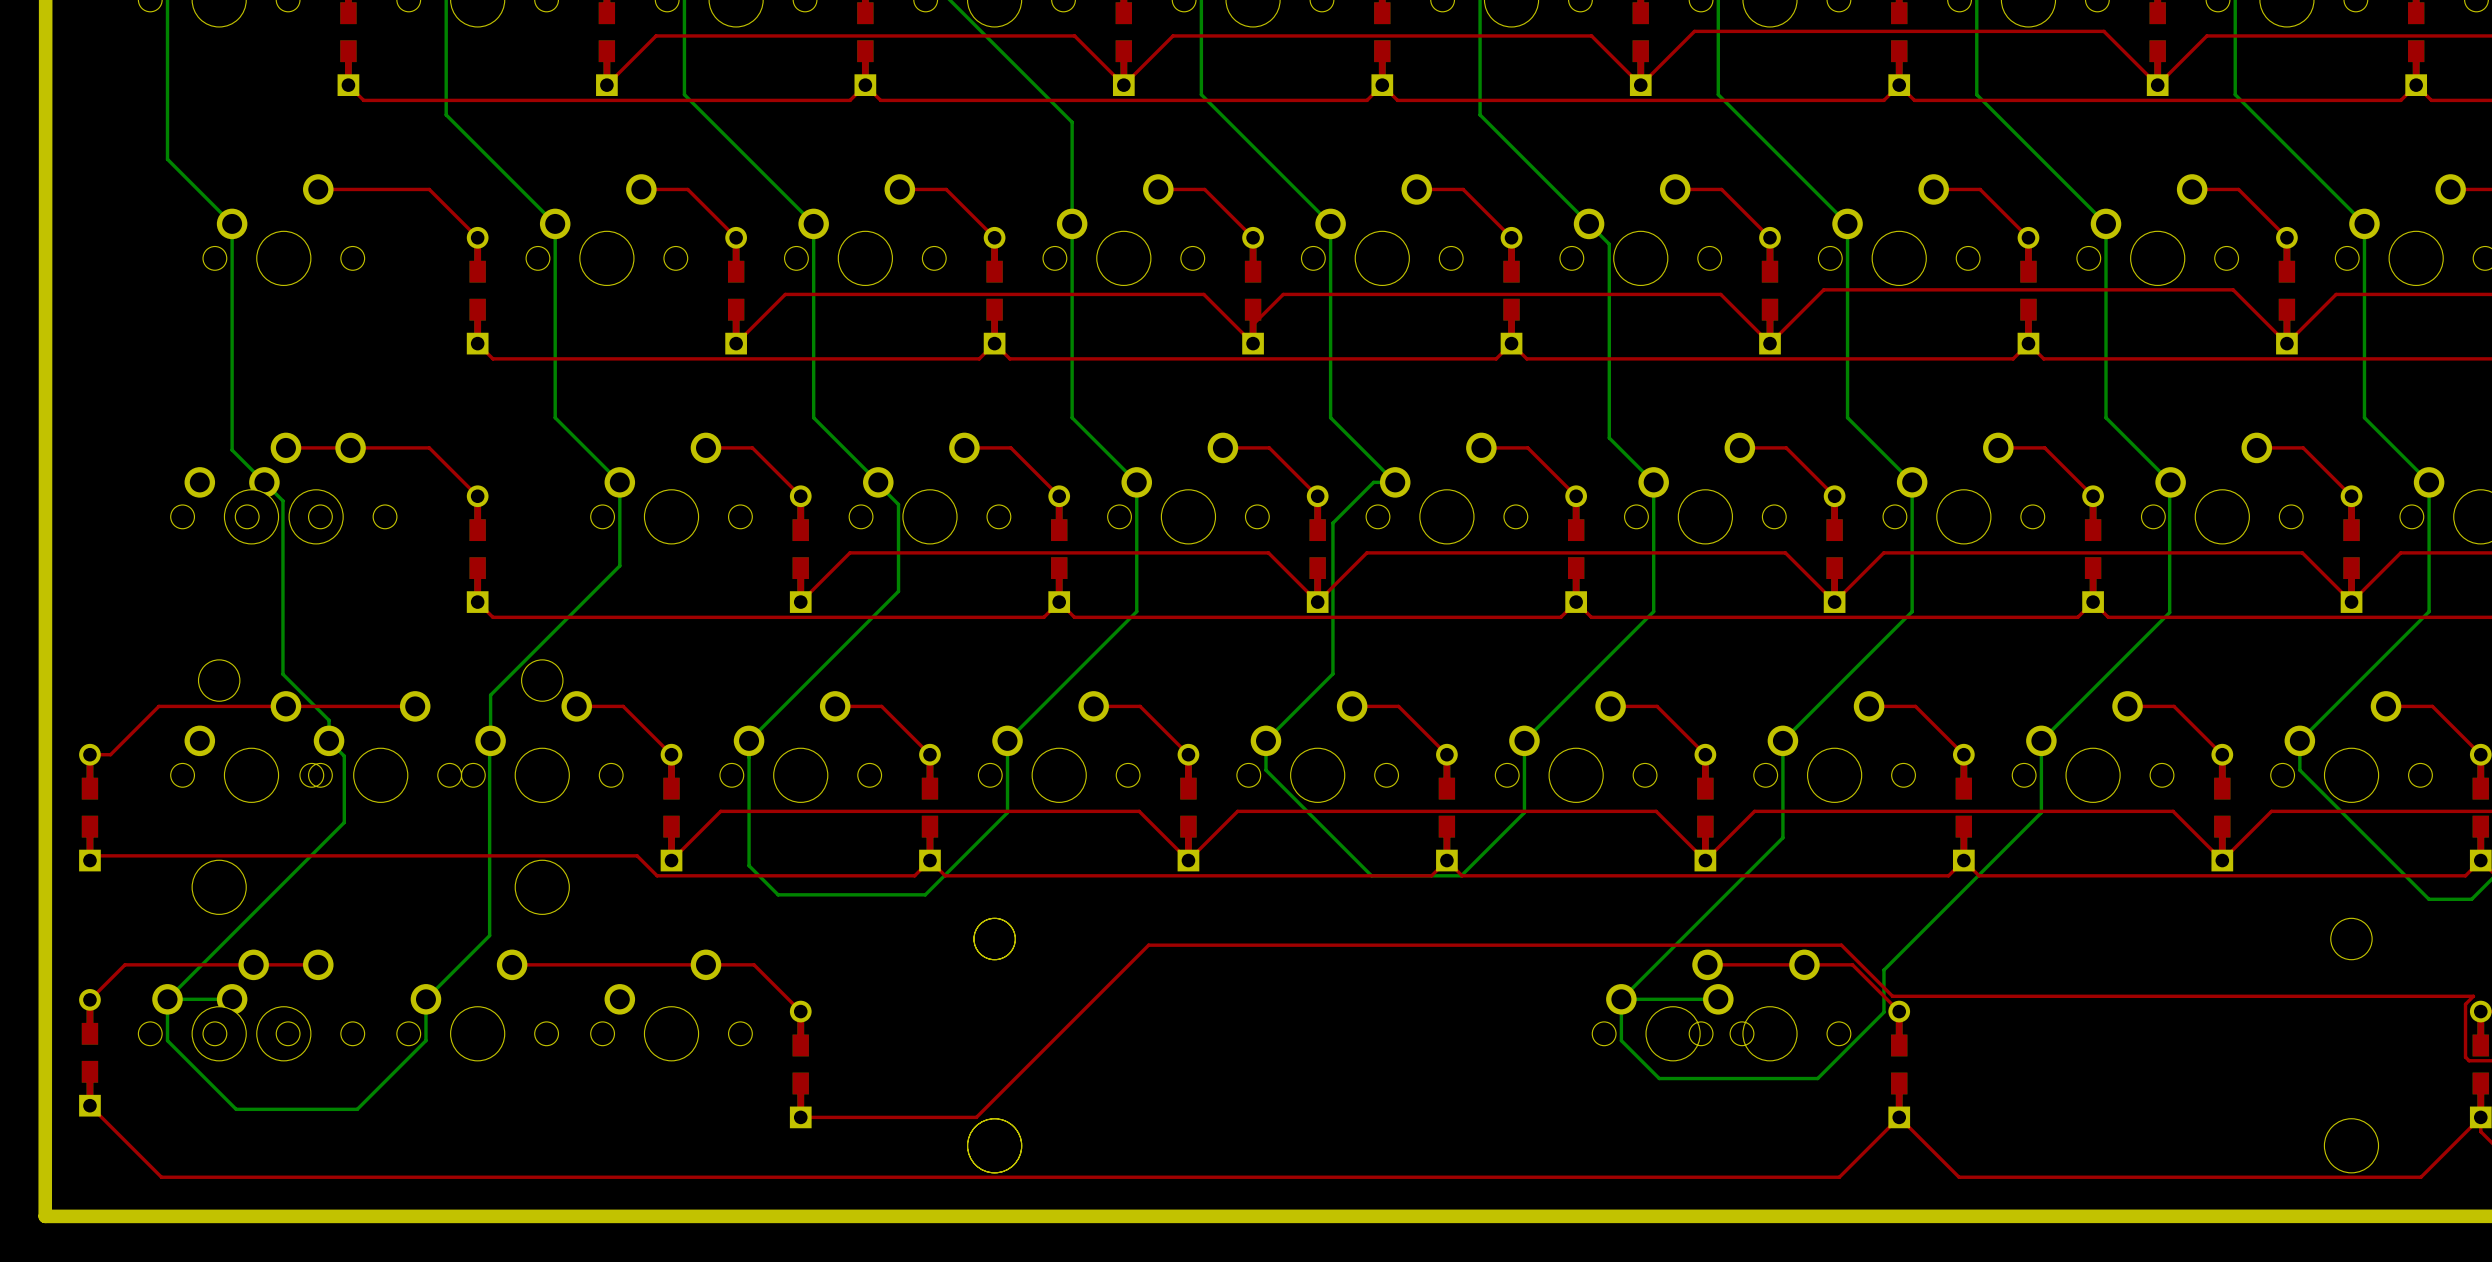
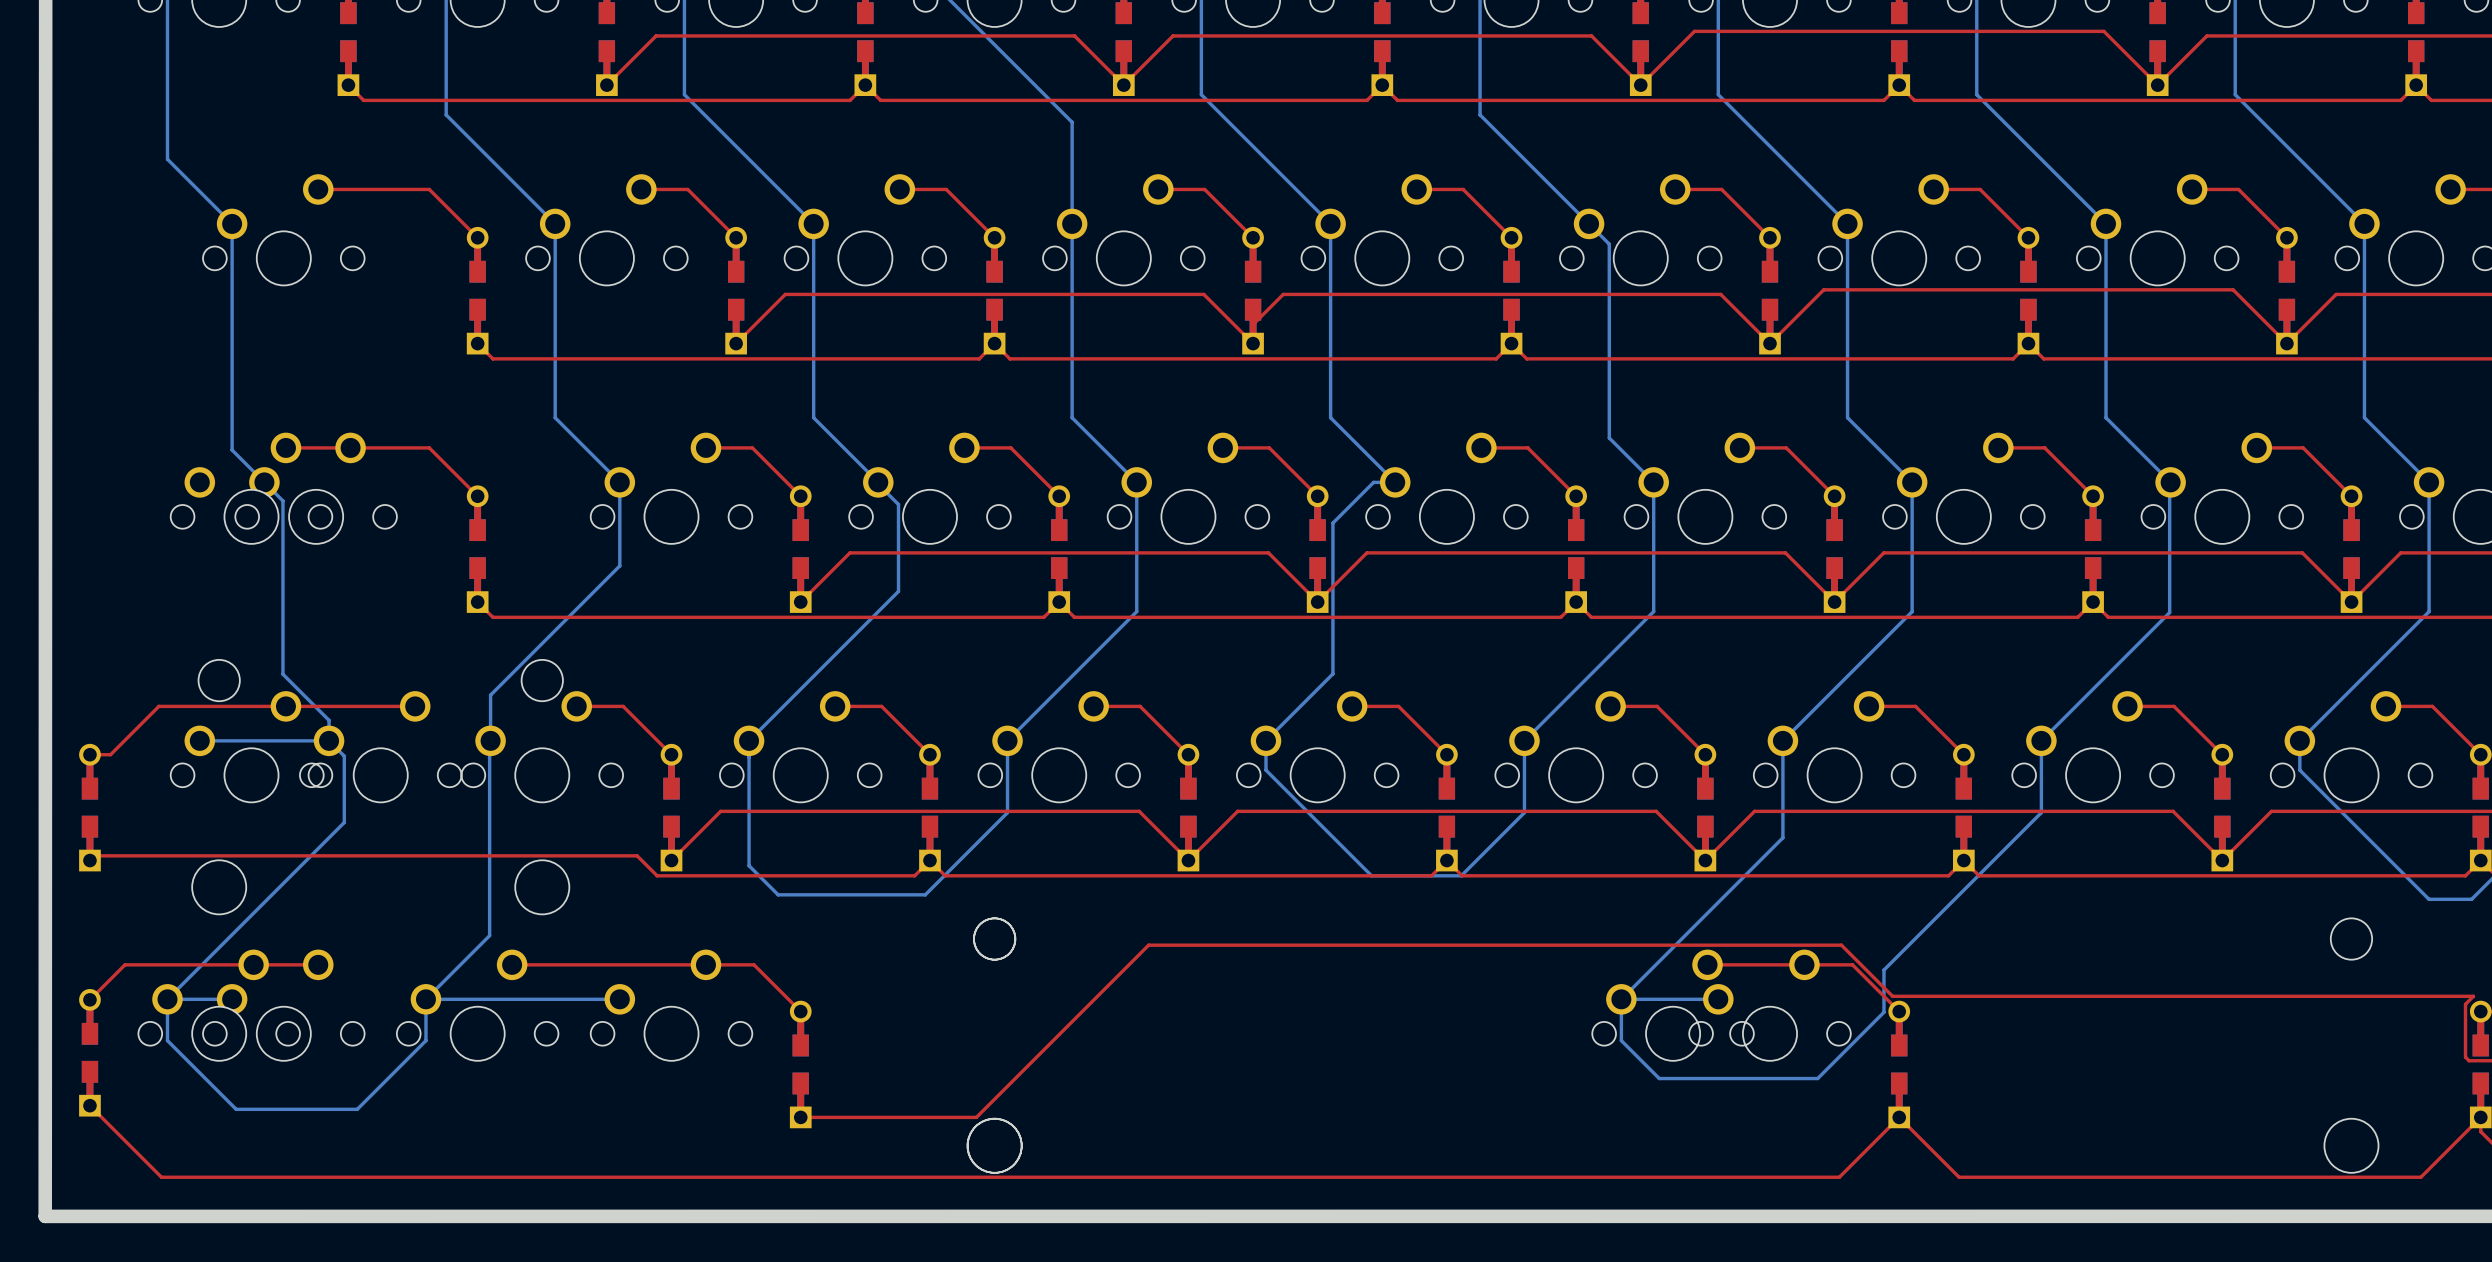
bottom track: none -> (199, 740) (329, 740)
bottom track: none -> (425, 999) (619, 999)

